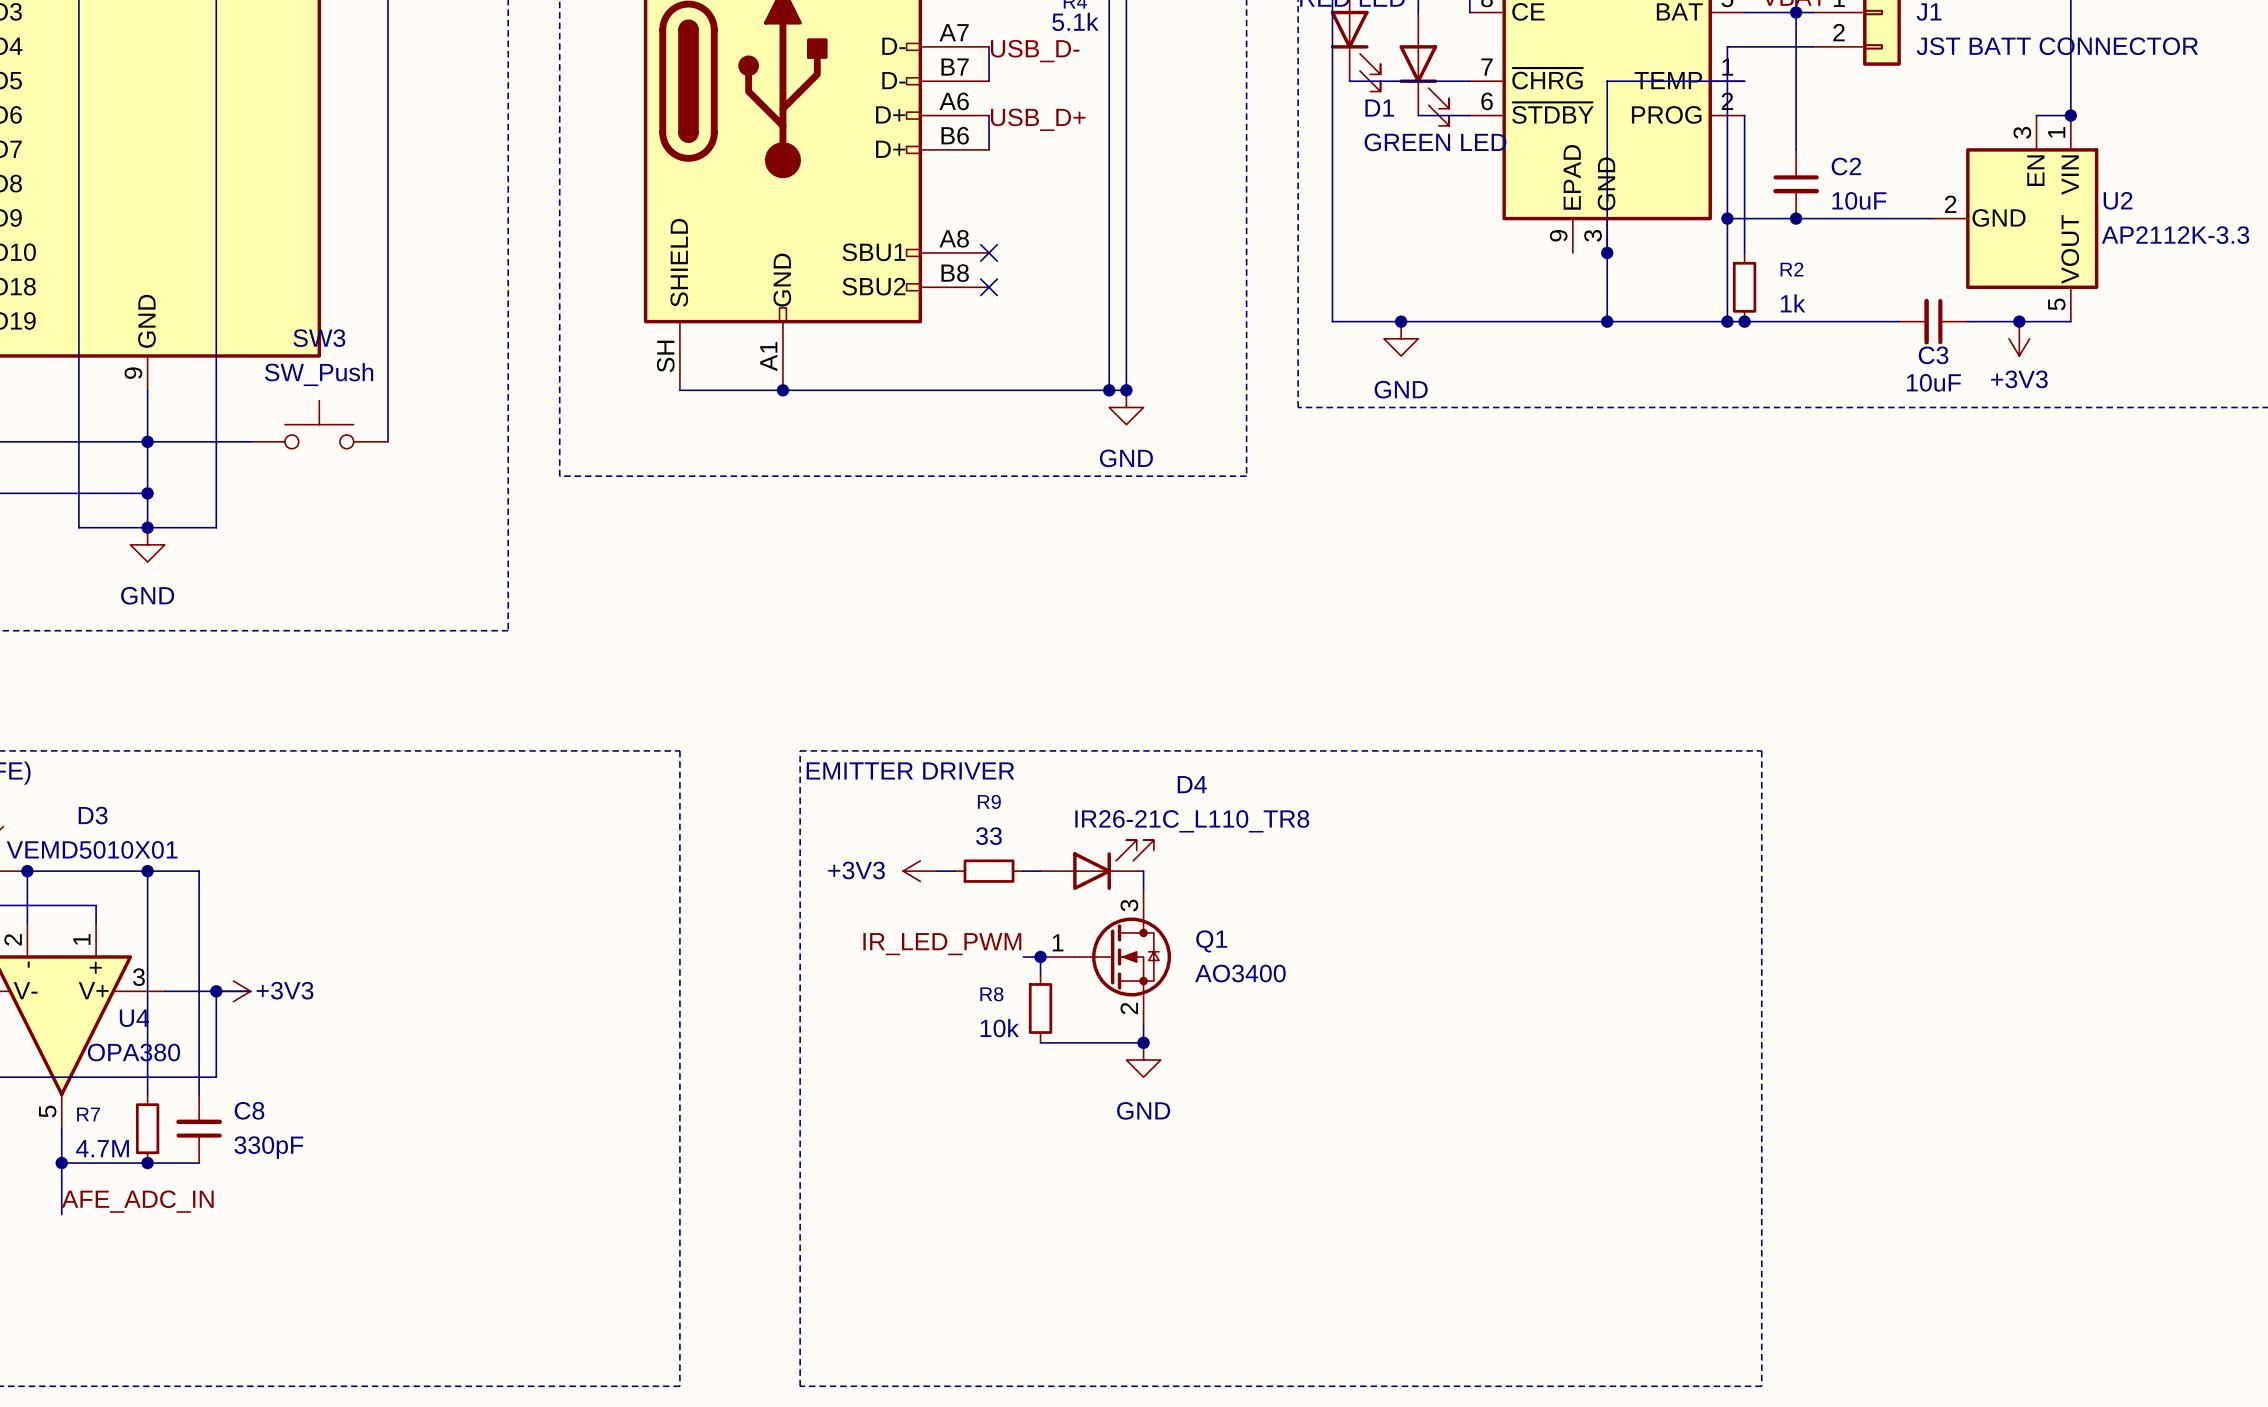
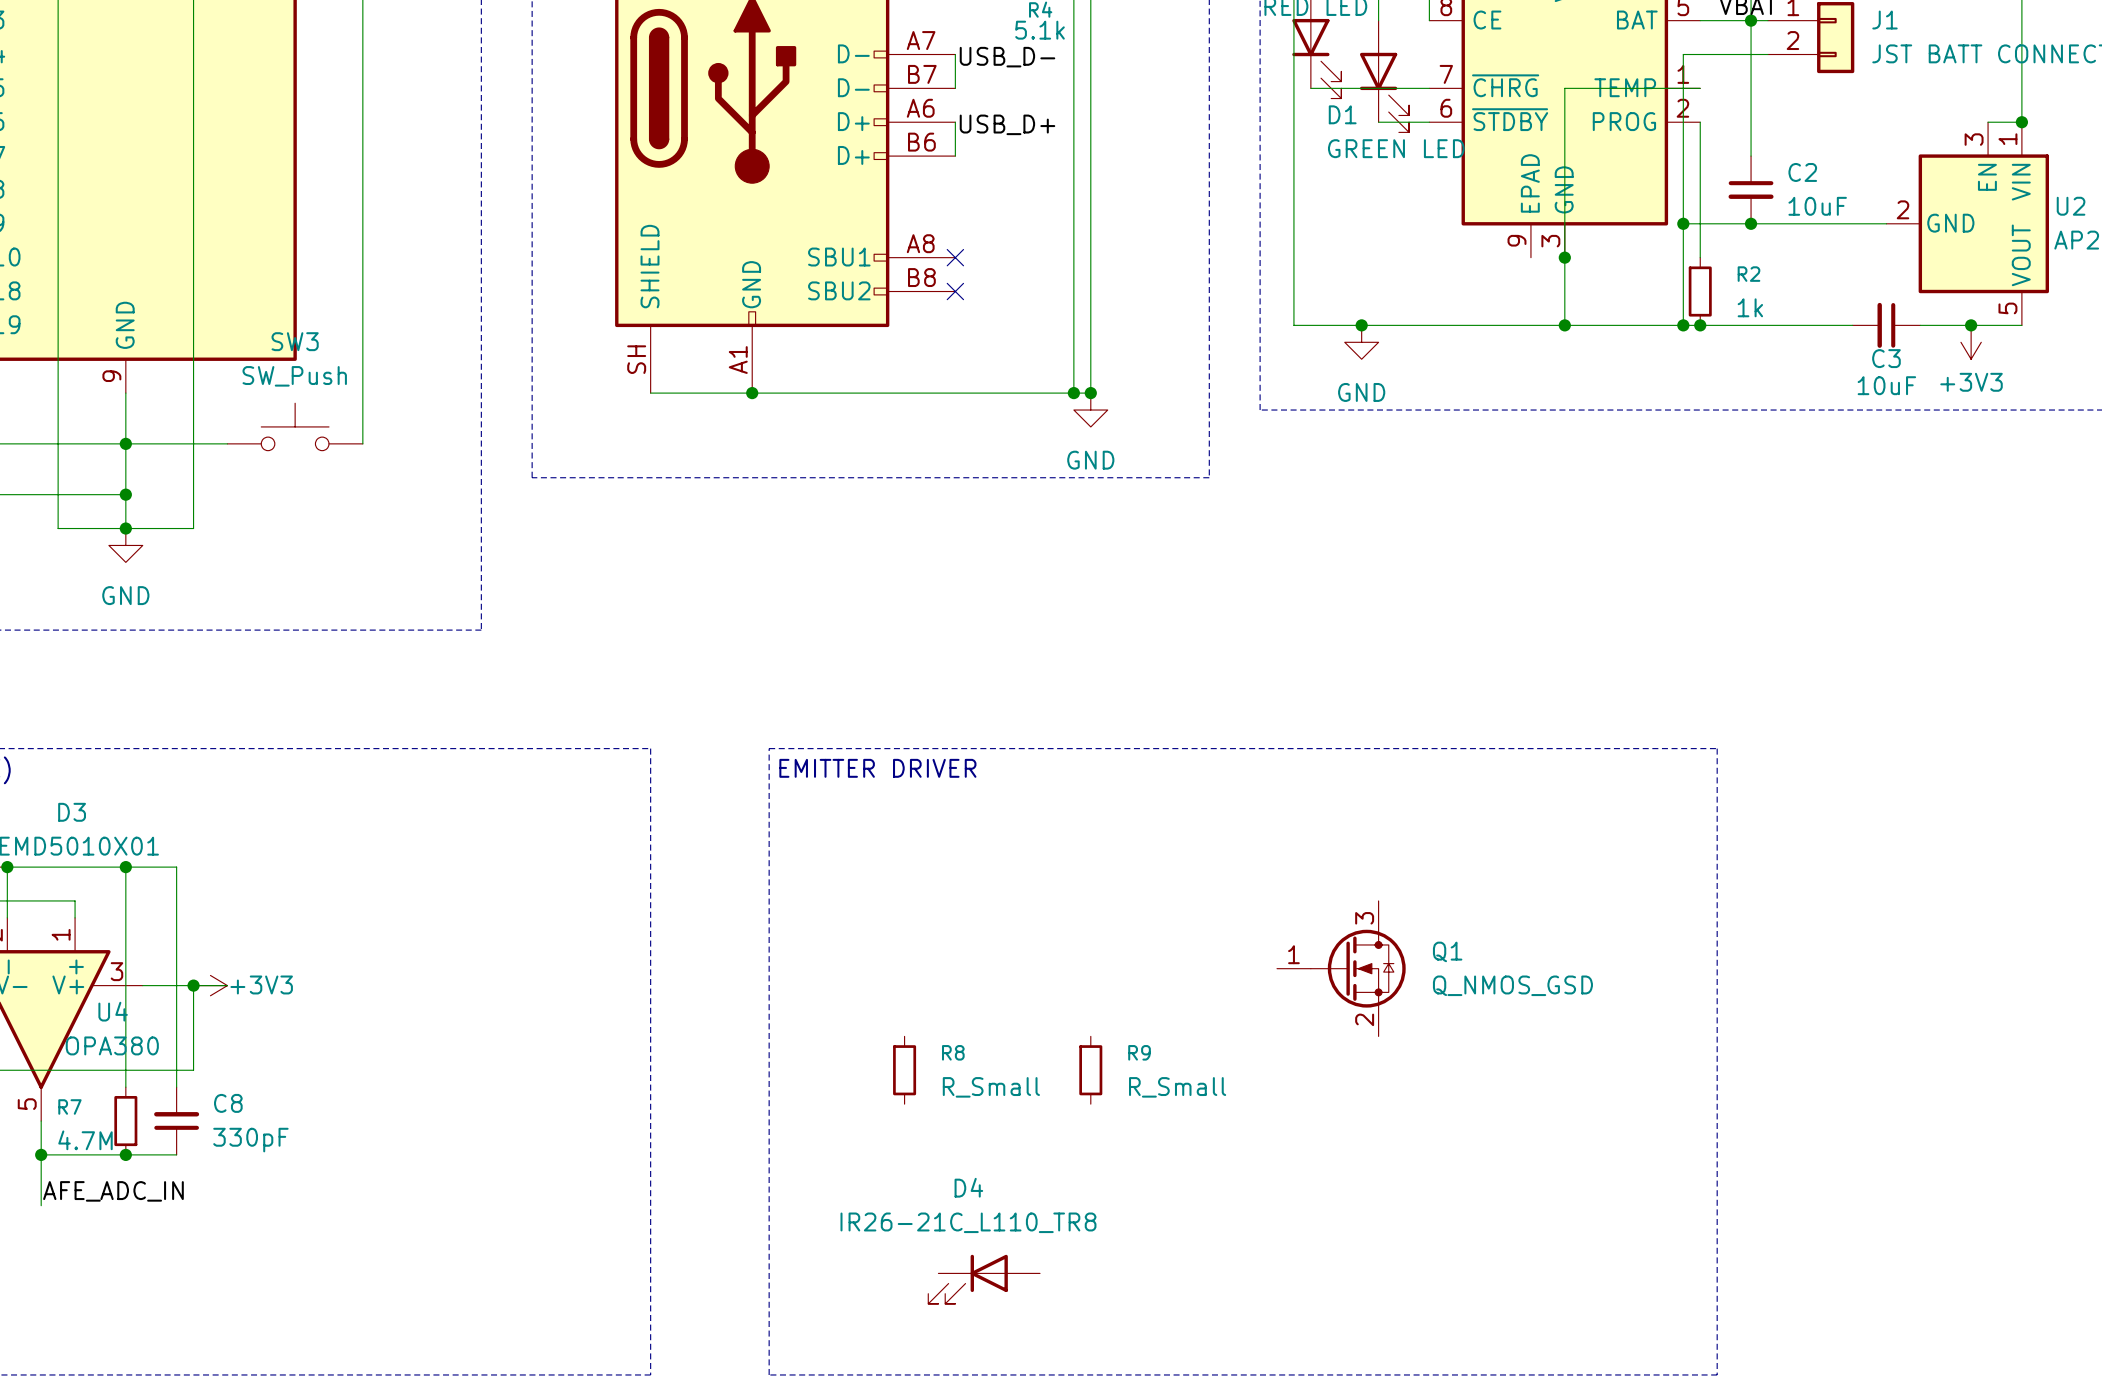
D4 name position: D4 (1192, 784) -> D4 (968, 1187)
D4 value position: IR26-21C_L110_TR8 (1192, 821) -> IR26-21C_L110_TR8 (968, 1222)
R9 value: 33 (988, 836) -> R_Small (1177, 1087)
D4 position: (1097, 865) -> (984, 1279)
D4 rotation: 0° (1113, 865) -> 180° (968, 1279)
power symbol: +3V3 (920, 871) -> none
wire: (937, 871) (954, 871) -> none
R9 rotation: 0° (989, 871) -> 90° clockwise (1090, 1070)
R9 position: (989, 871) -> (1090, 1070)
wire: (1023, 871) (1040, 871) -> none
wire: (1143, 871) (1143, 888) -> none
label: IR_LED_PWM (942, 944) -> none
wire: (1023, 956) (1040, 956) (1040, 974) -> none
junction: (1040, 956) -> none
Q1 position: (1105, 956) -> (1341, 968)
Q1 value: AO3400 (1240, 973) -> Q_NMOS_GSD (1512, 985)
R8 name position: R8 (991, 994) -> R8 (953, 1052)
R8 position: (1040, 1008) -> (904, 1070)
wire: (1143, 1025) (1143, 1042) (1040, 1042) -> none
R8 value: 10k (999, 1028) -> R_Small (991, 1087)
junction: (1143, 1042) -> none
power symbol: GND (1143, 1060) -> none

